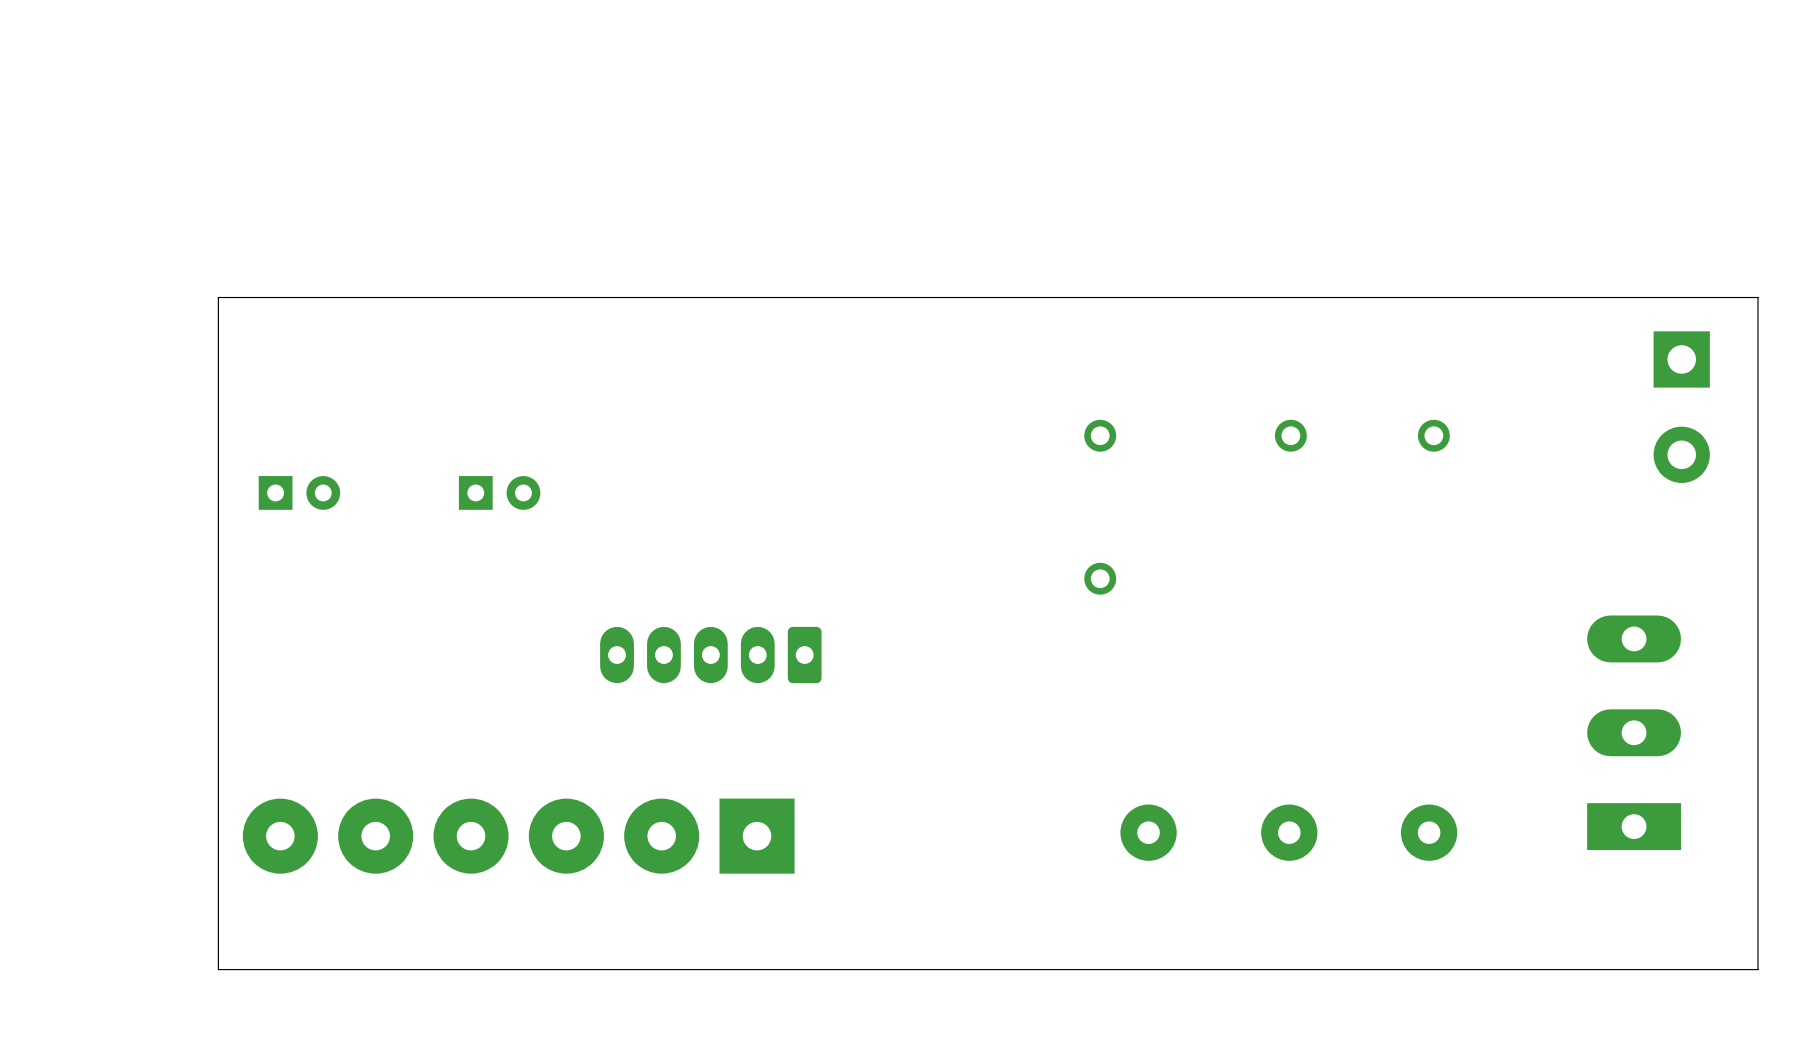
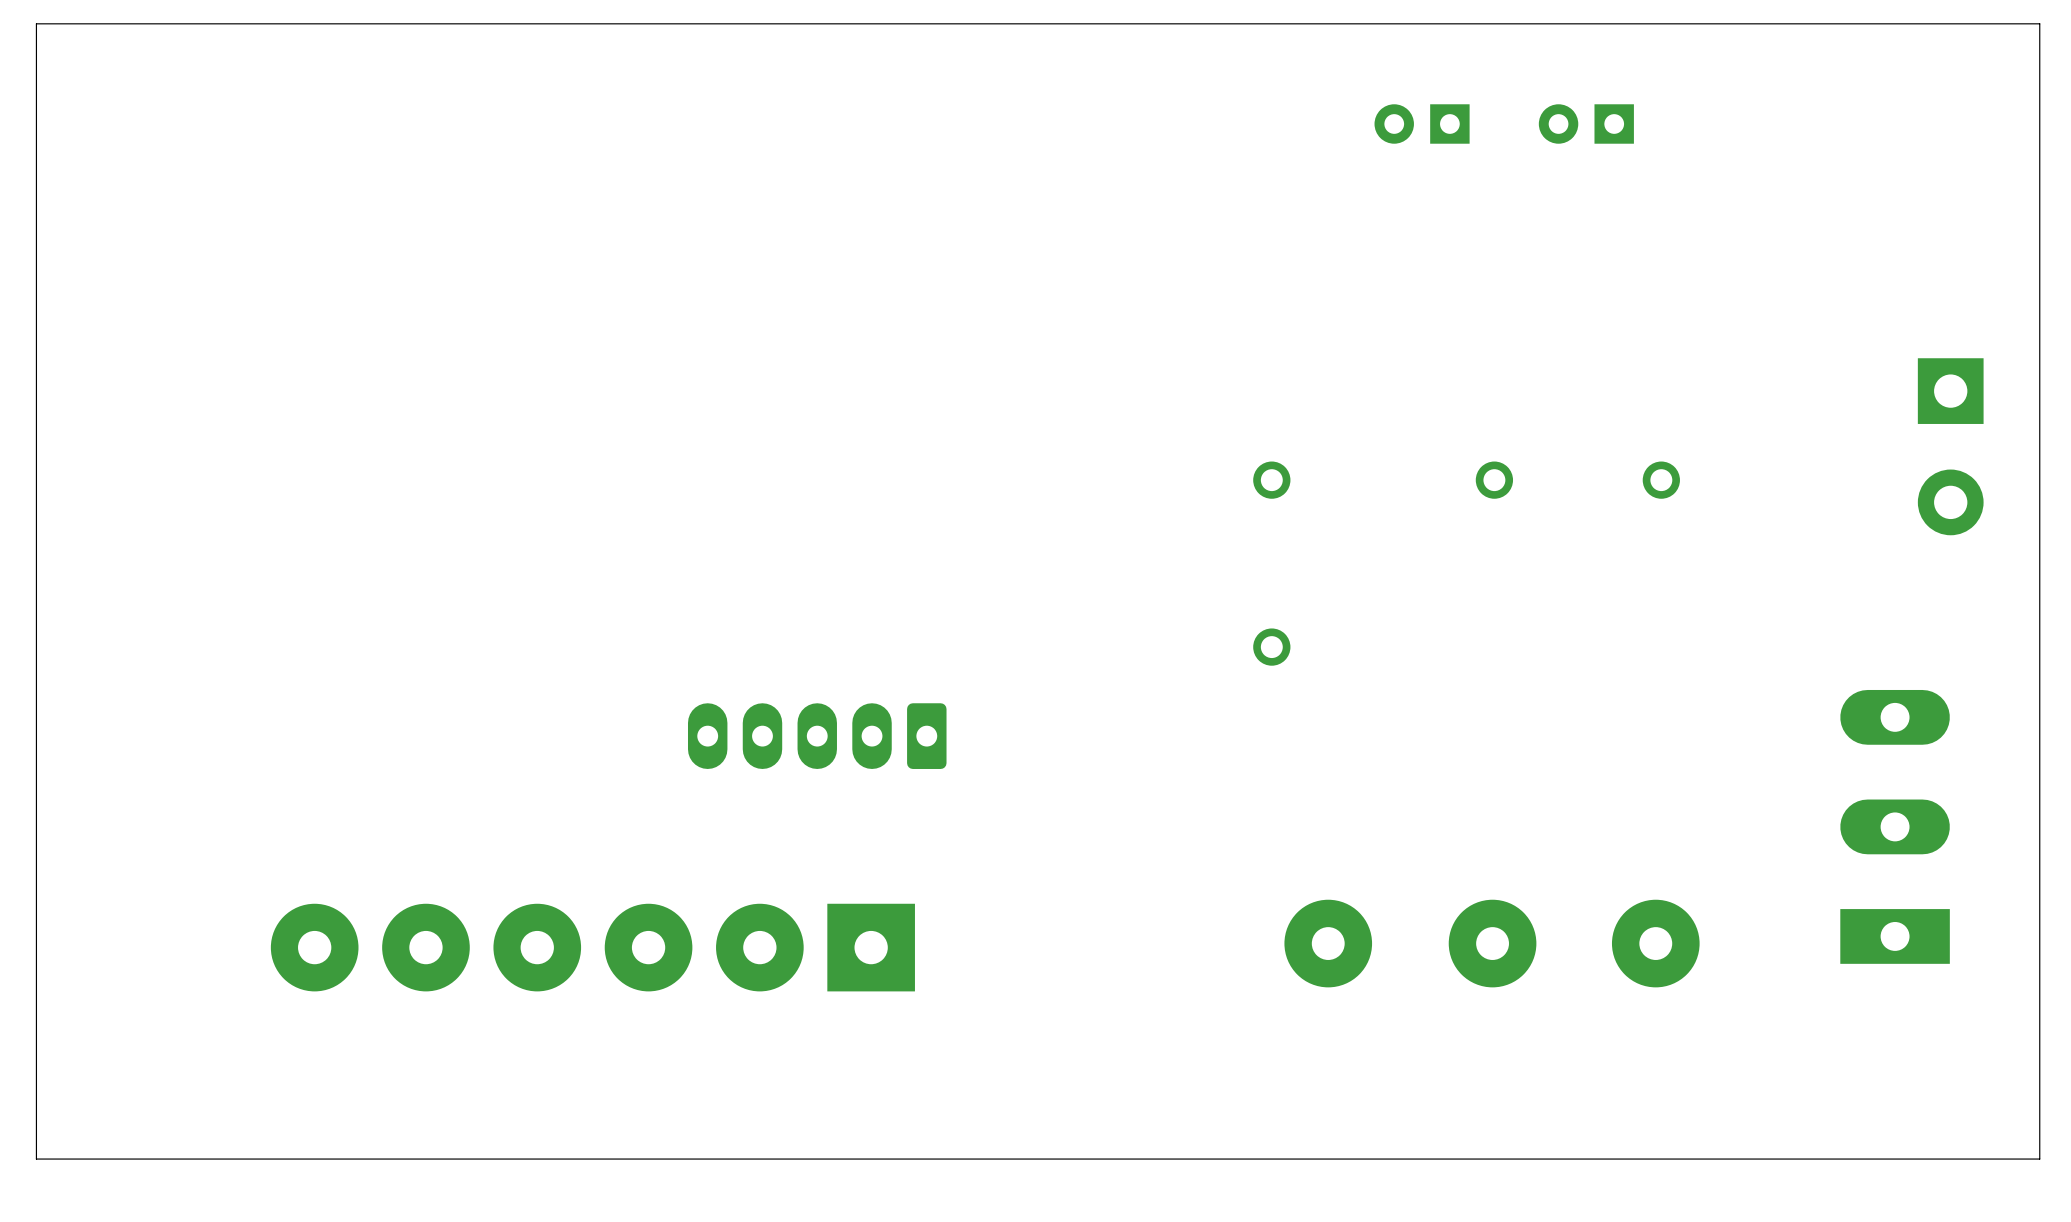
part: none -> (1422, 123)
part: none -> (1586, 123)
board edge: (1757, 297) (218, 297) (218, 969) (1757, 969) -> (2039, 318) (2039, 23) (36, 23) (36, 1159) (2039, 1159) (2039, 1103)
part: (299, 492) -> none
part: (499, 492) -> none
part footprint: [1120, 804, 1177, 861] -> [1284, 899, 1373, 988]
part footprint: [1261, 804, 1318, 861] -> [1448, 899, 1537, 988]
part footprint: [1400, 804, 1458, 861] -> [1611, 899, 1700, 988]

